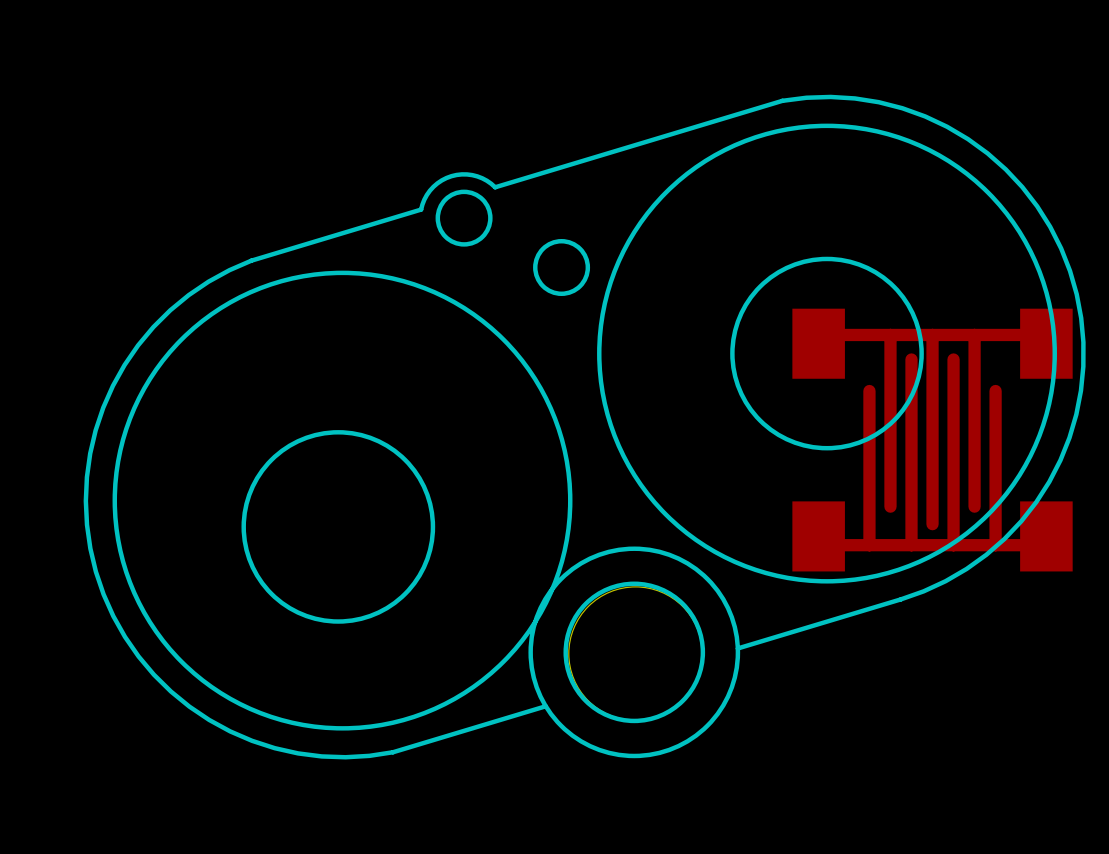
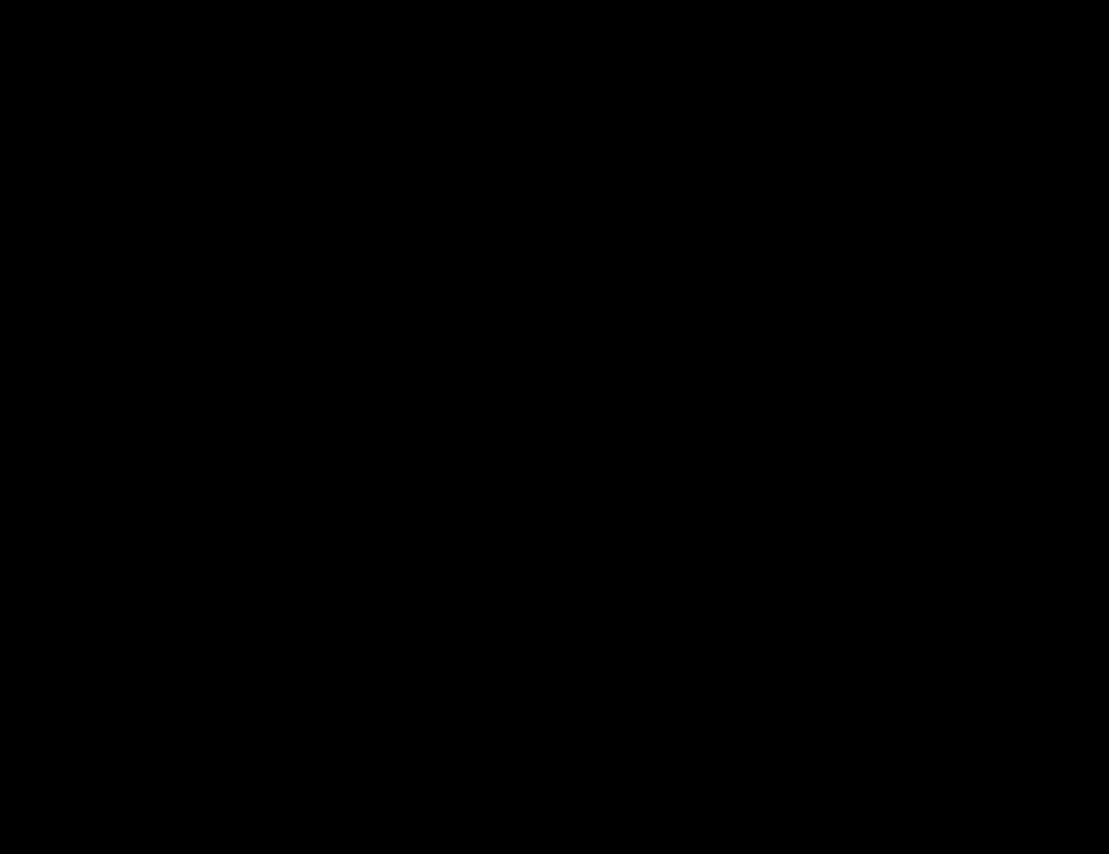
part: (584, 427) -> none
part: (932, 440) -> none

